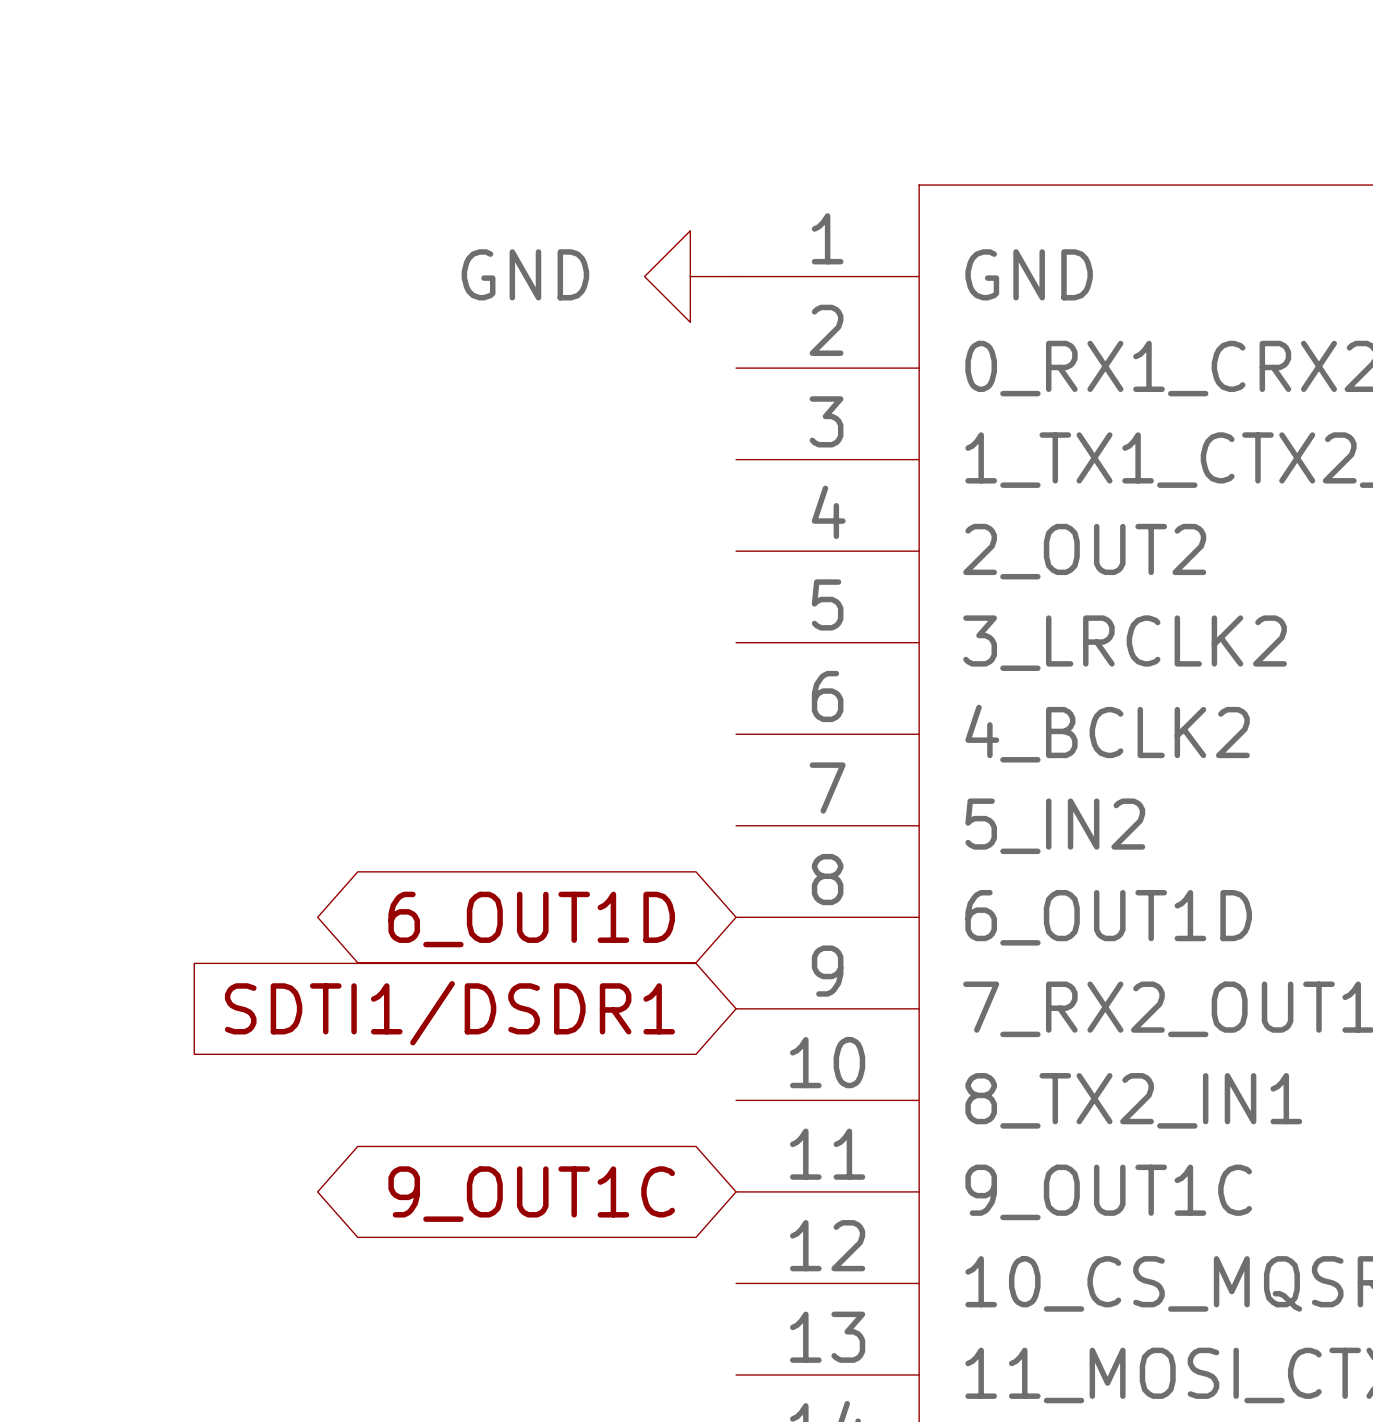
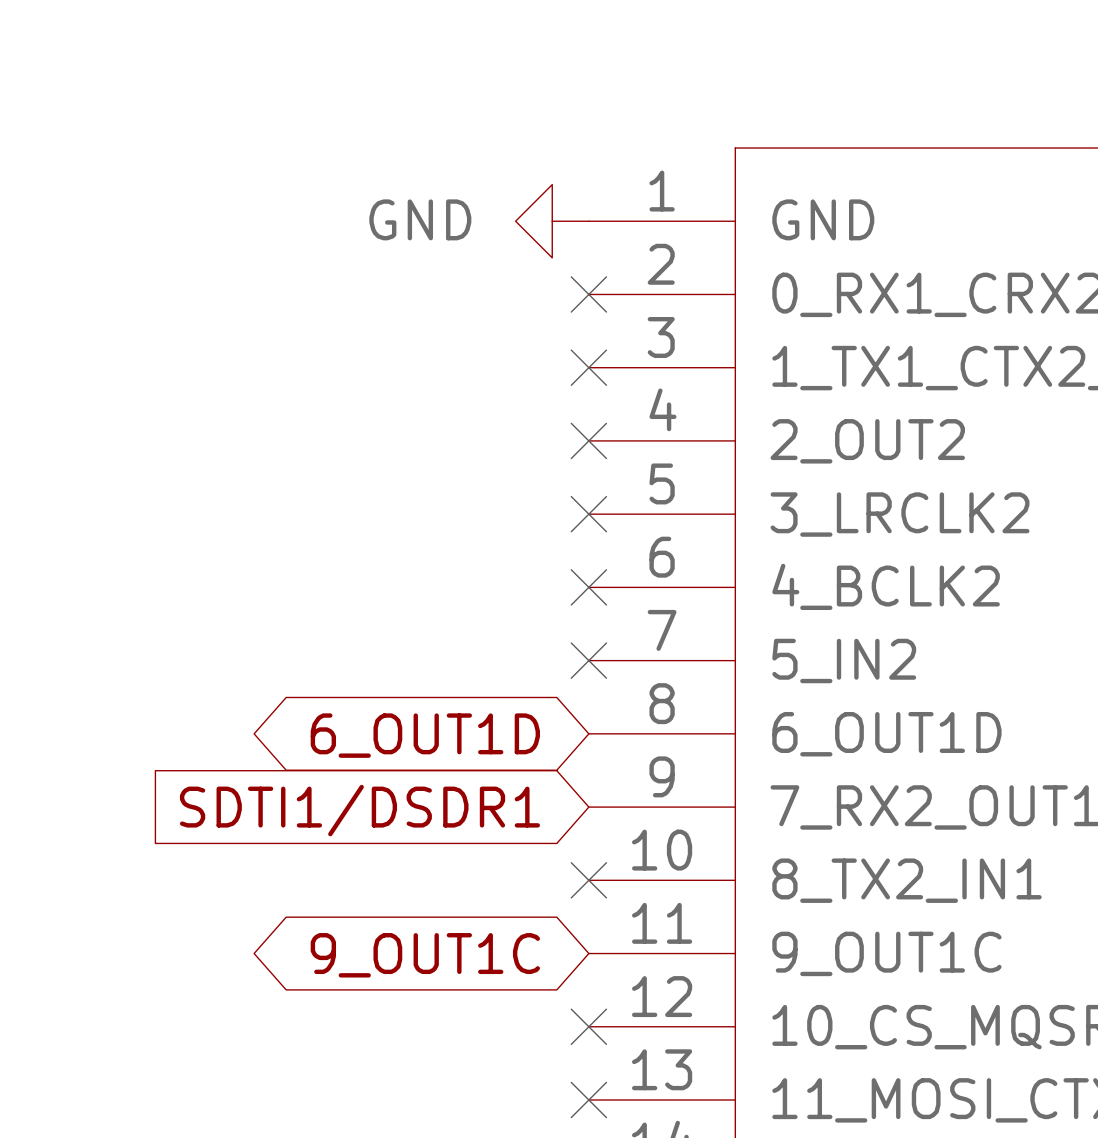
no-connect mark: none -> (588, 294)
no-connect mark: none -> (588, 367)
no-connect mark: none -> (588, 440)
no-connect mark: none -> (588, 514)
no-connect mark: none -> (588, 587)
no-connect mark: none -> (588, 660)
no-connect mark: none -> (588, 880)
no-connect mark: none -> (588, 1026)
no-connect mark: none -> (588, 1099)

